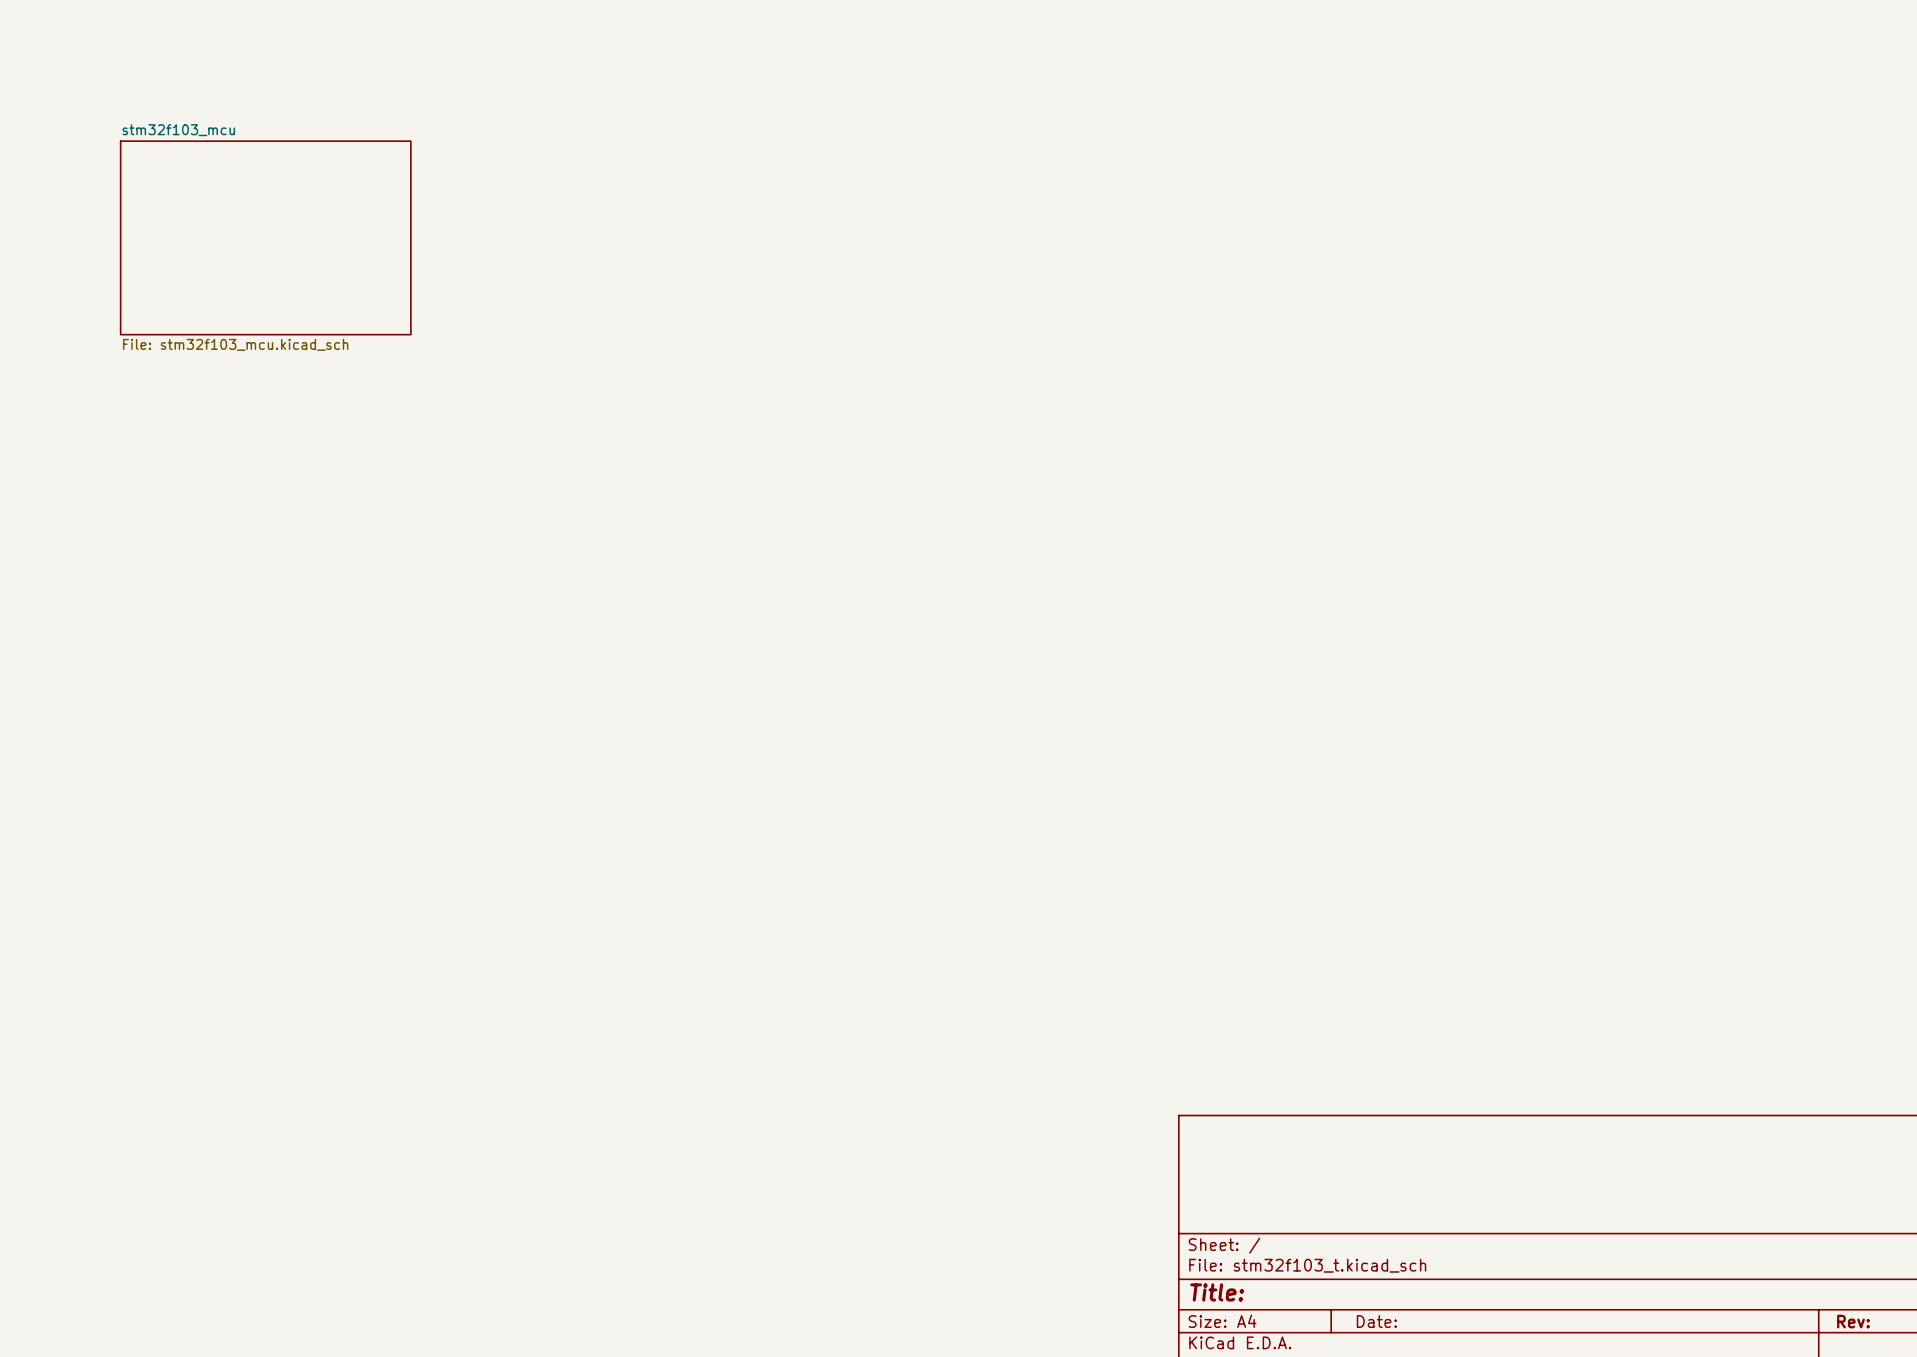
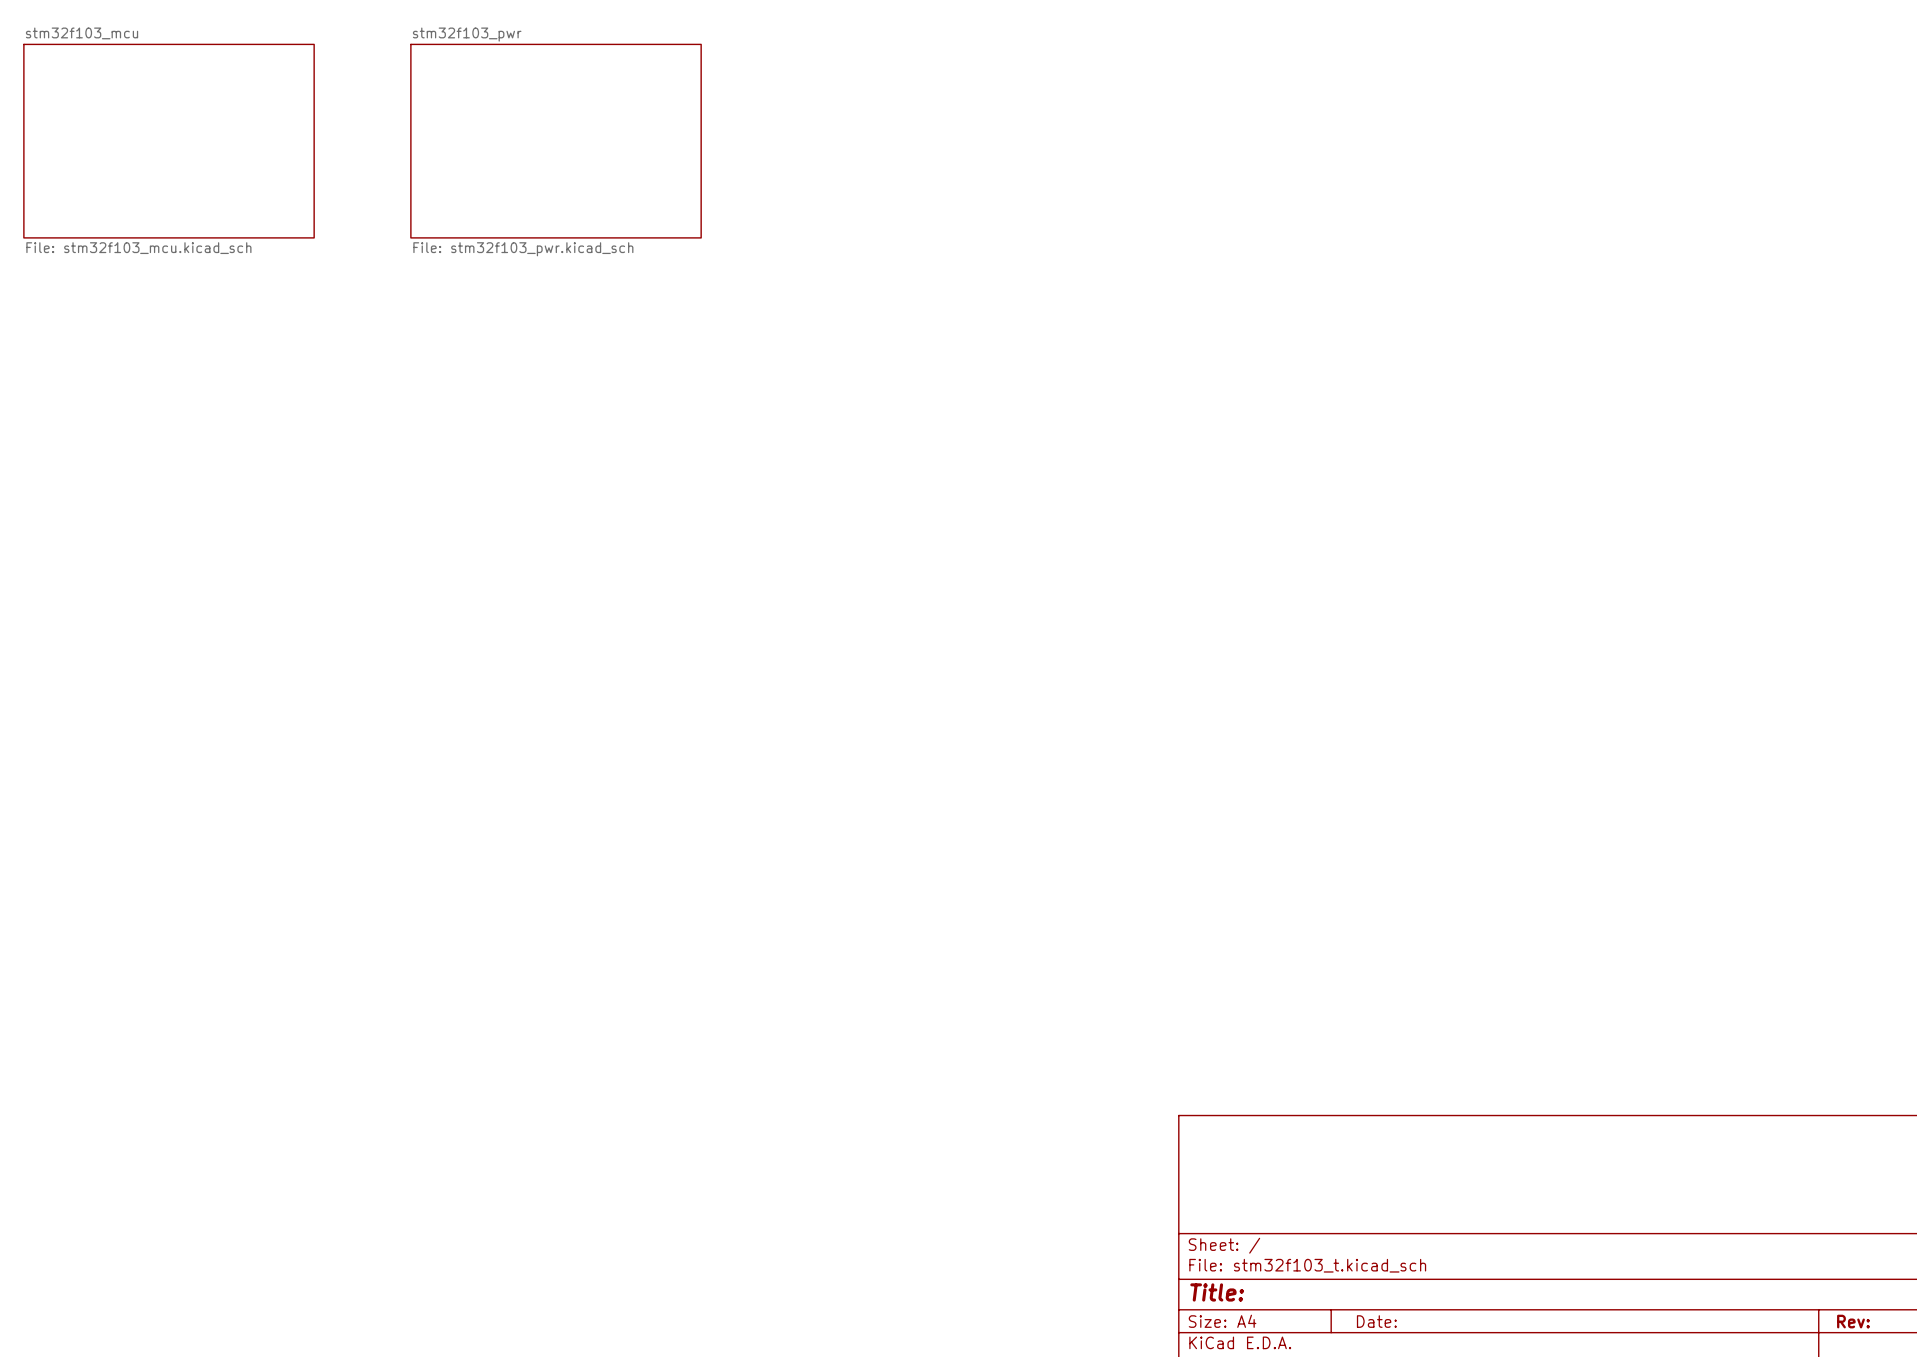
sheet stm32f103_pwr: none -> File: stm32f103_pwr.kicad_sch (556, 141)
sheet stm32f103_mcu position: (265, 237) -> (169, 141)

